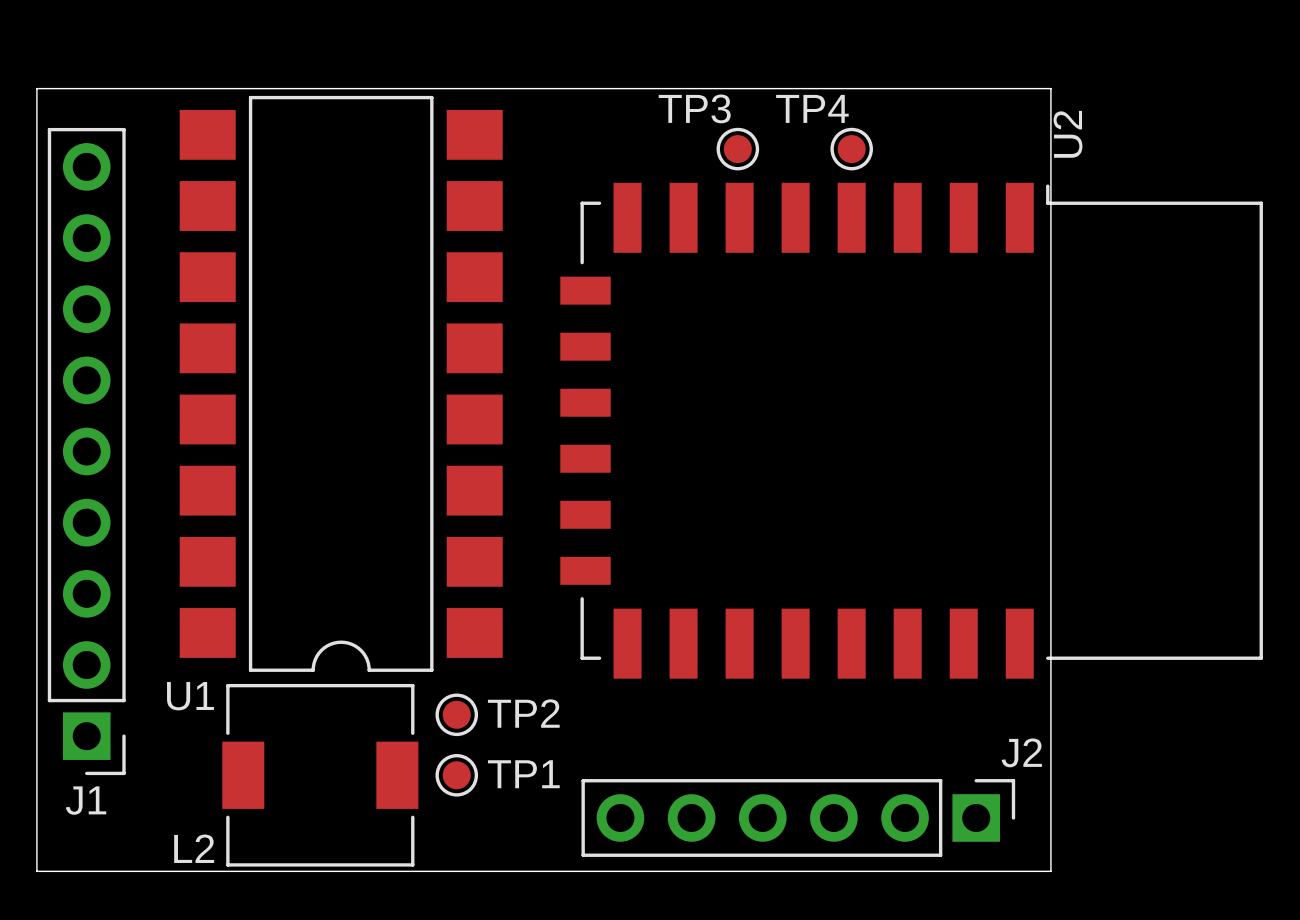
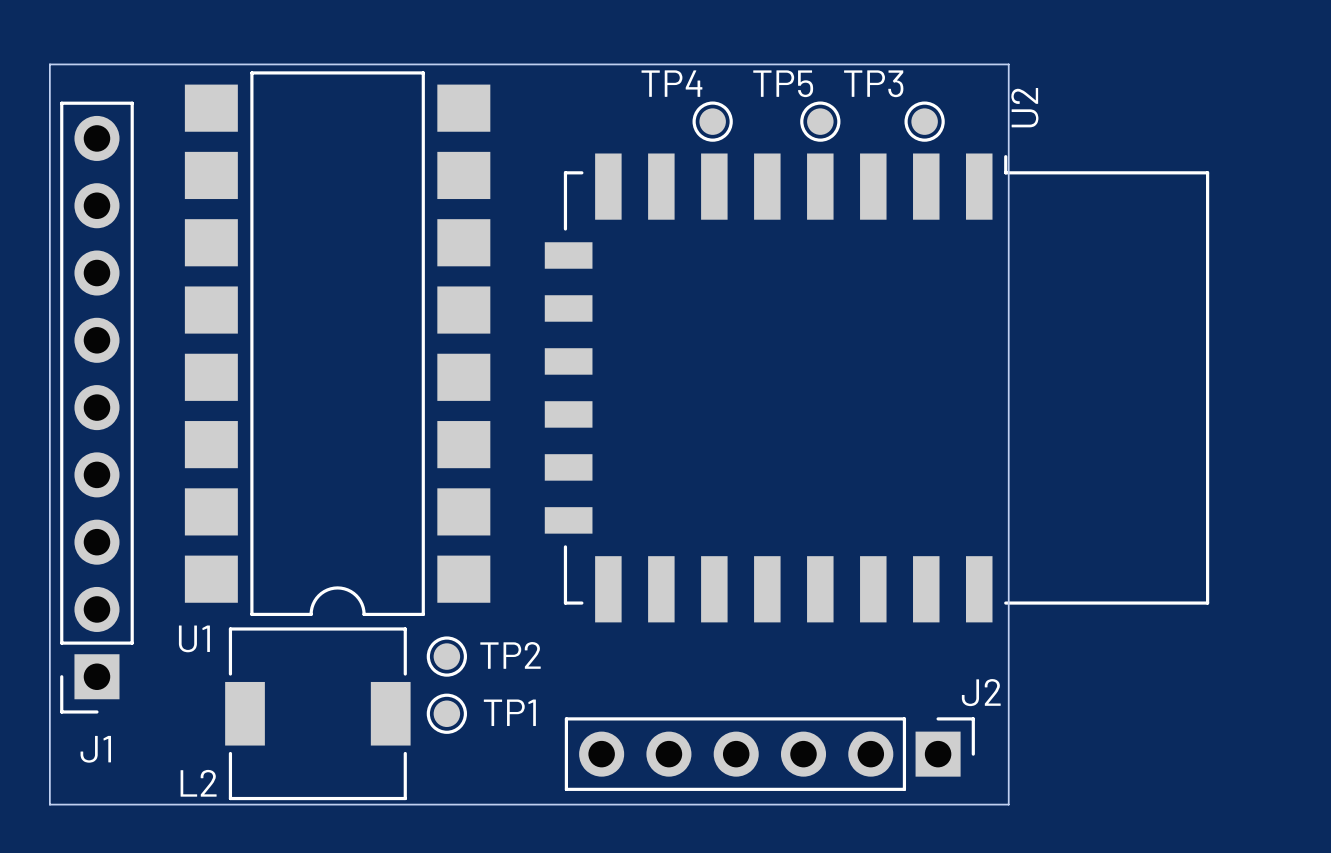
TP3 name: TP3 (694, 108) -> TP4 (671, 83)
TP4 name: TP4 (812, 108) -> TP5 (783, 83)
J1 footprint: [47, 127, 126, 776] -> [60, 101, 134, 714]
TP3: none -> (924, 121)

